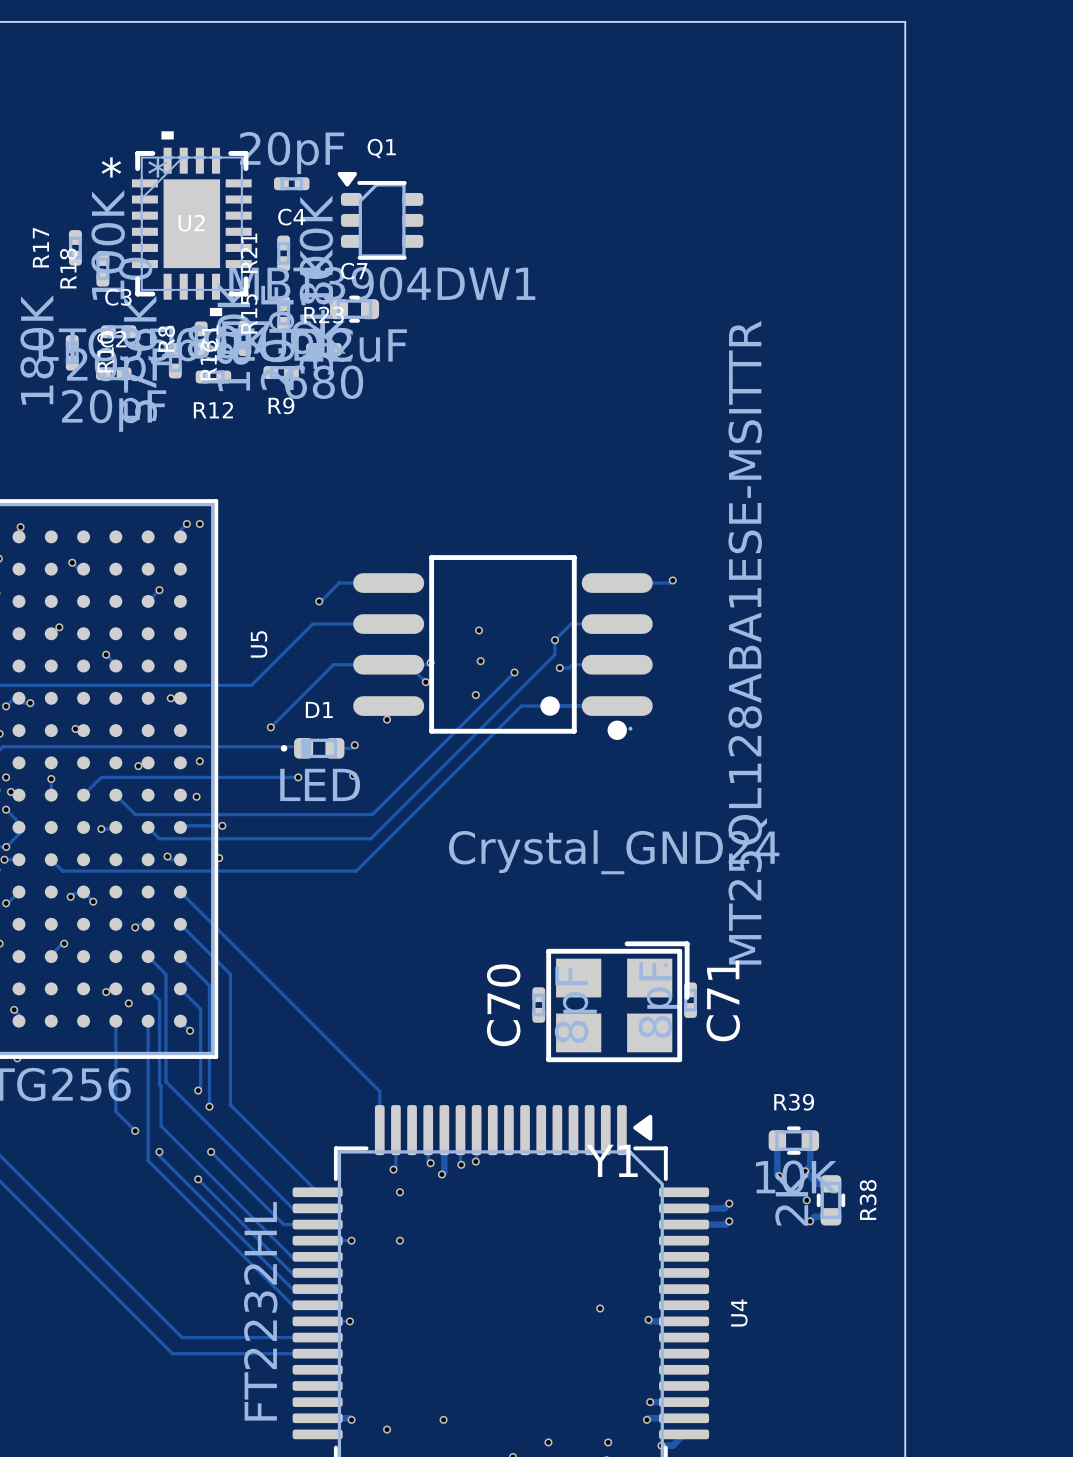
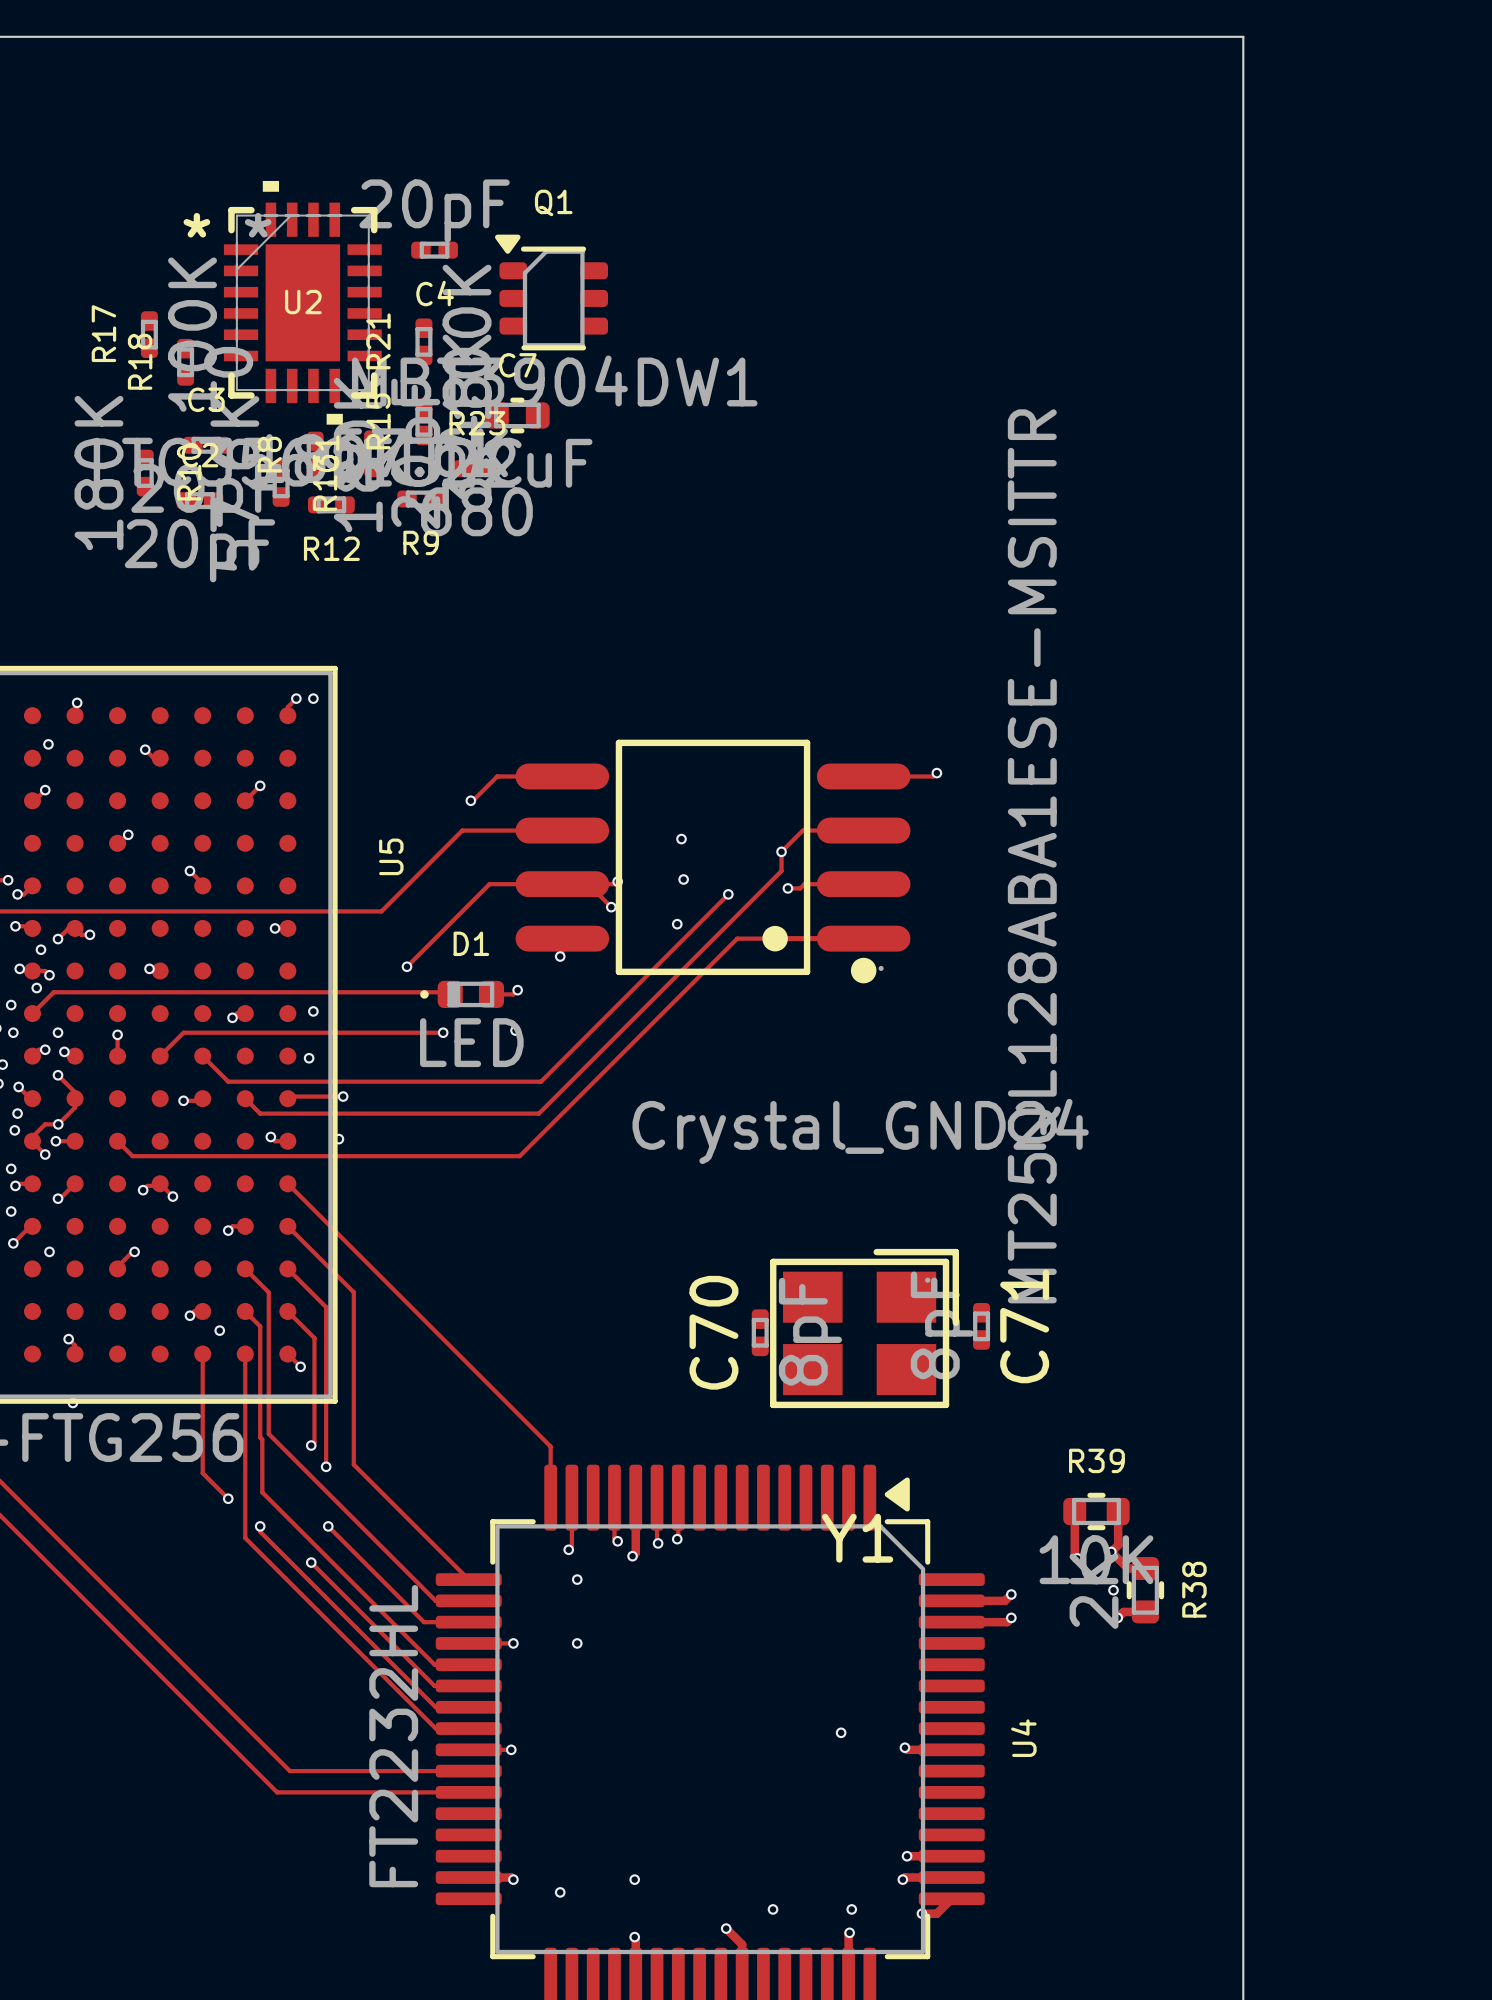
C71 position: (690, 1000) -> (981, 1326)

